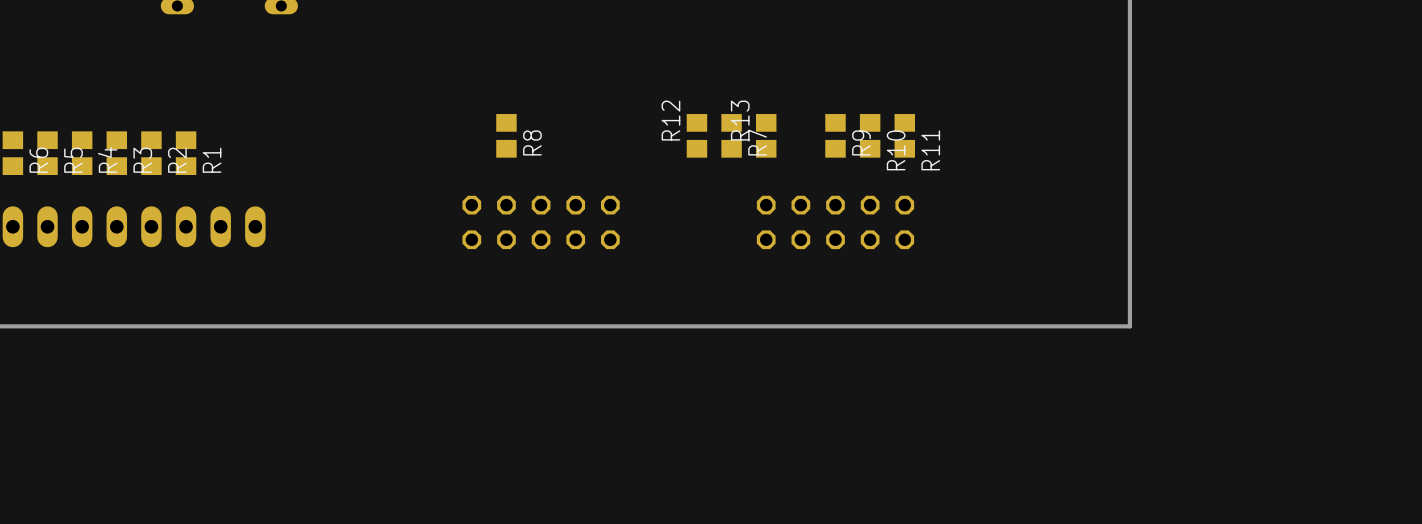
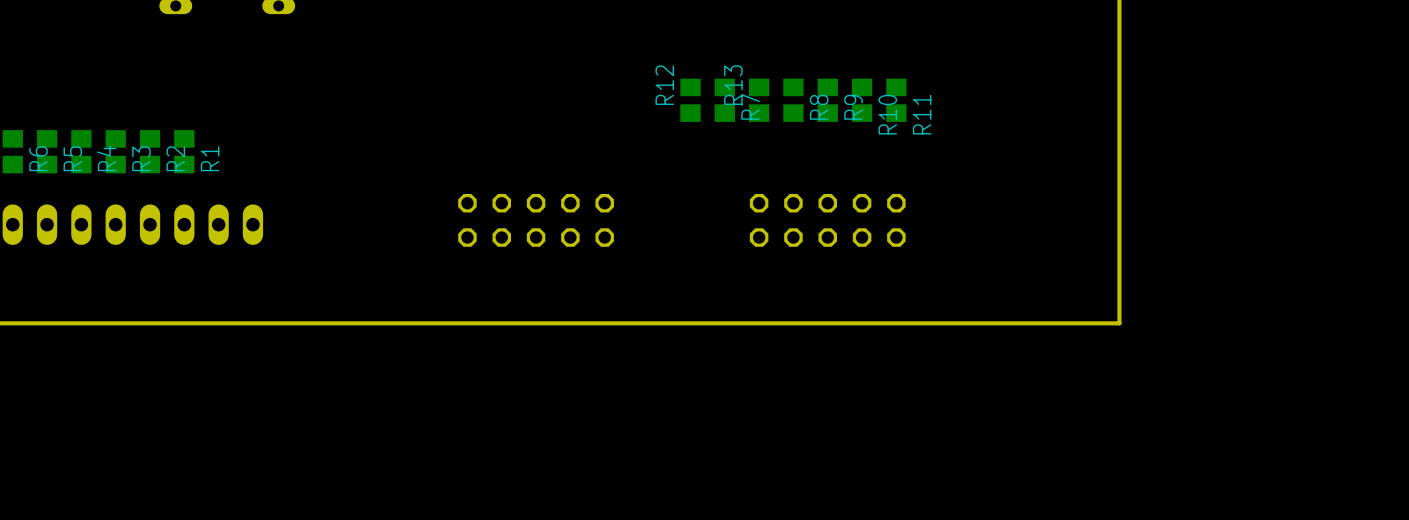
R8 position: (506, 135) -> (793, 100)
R12 position: (696, 135) -> (690, 100)
R7 position: (731, 135) -> (724, 100)
R13 position: (766, 135) -> (759, 100)
R9 position: (835, 135) -> (827, 100)
R10 position: (870, 135) -> (862, 100)
R11 position: (904, 135) -> (896, 100)

